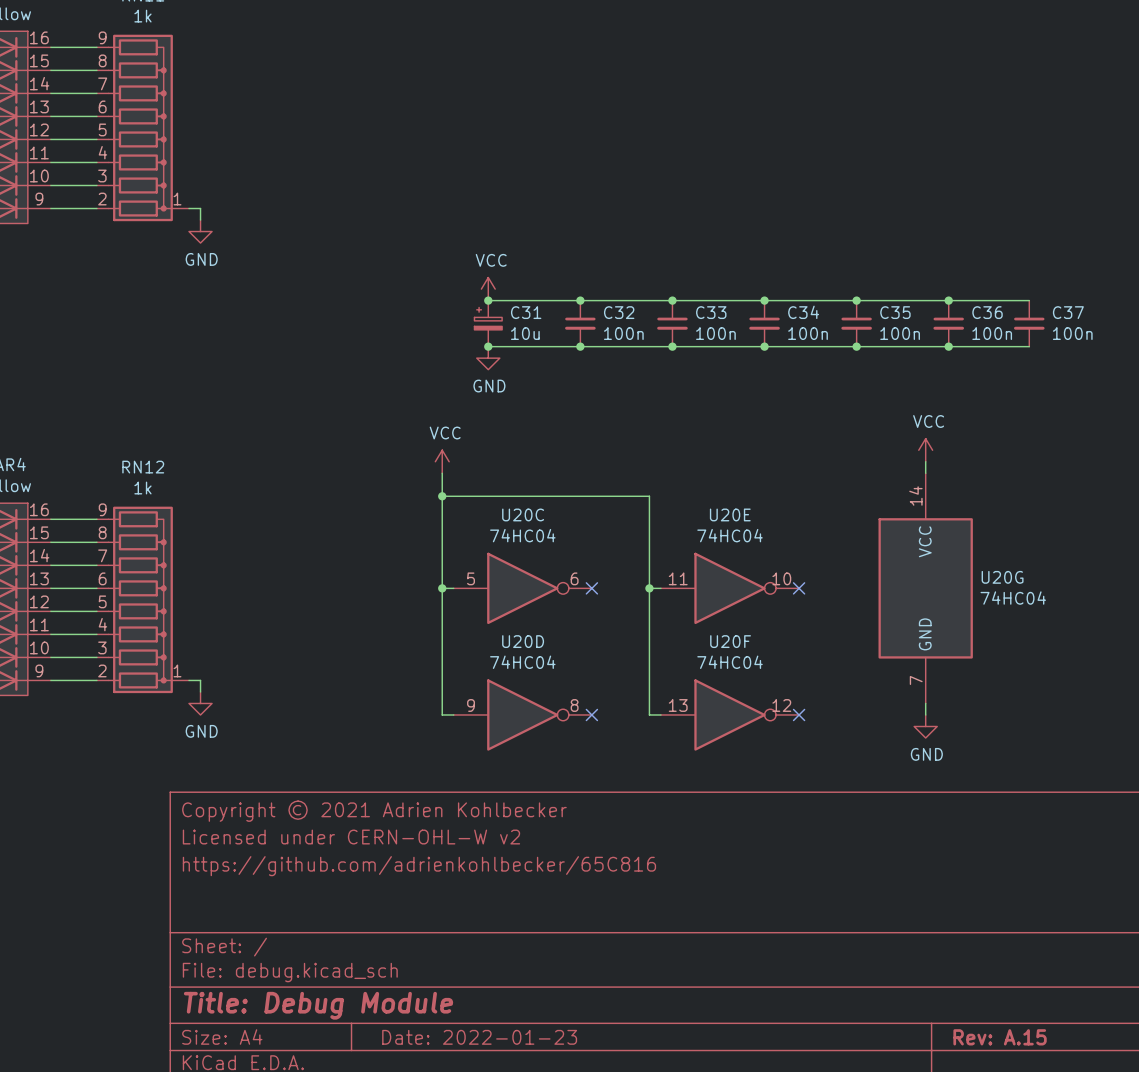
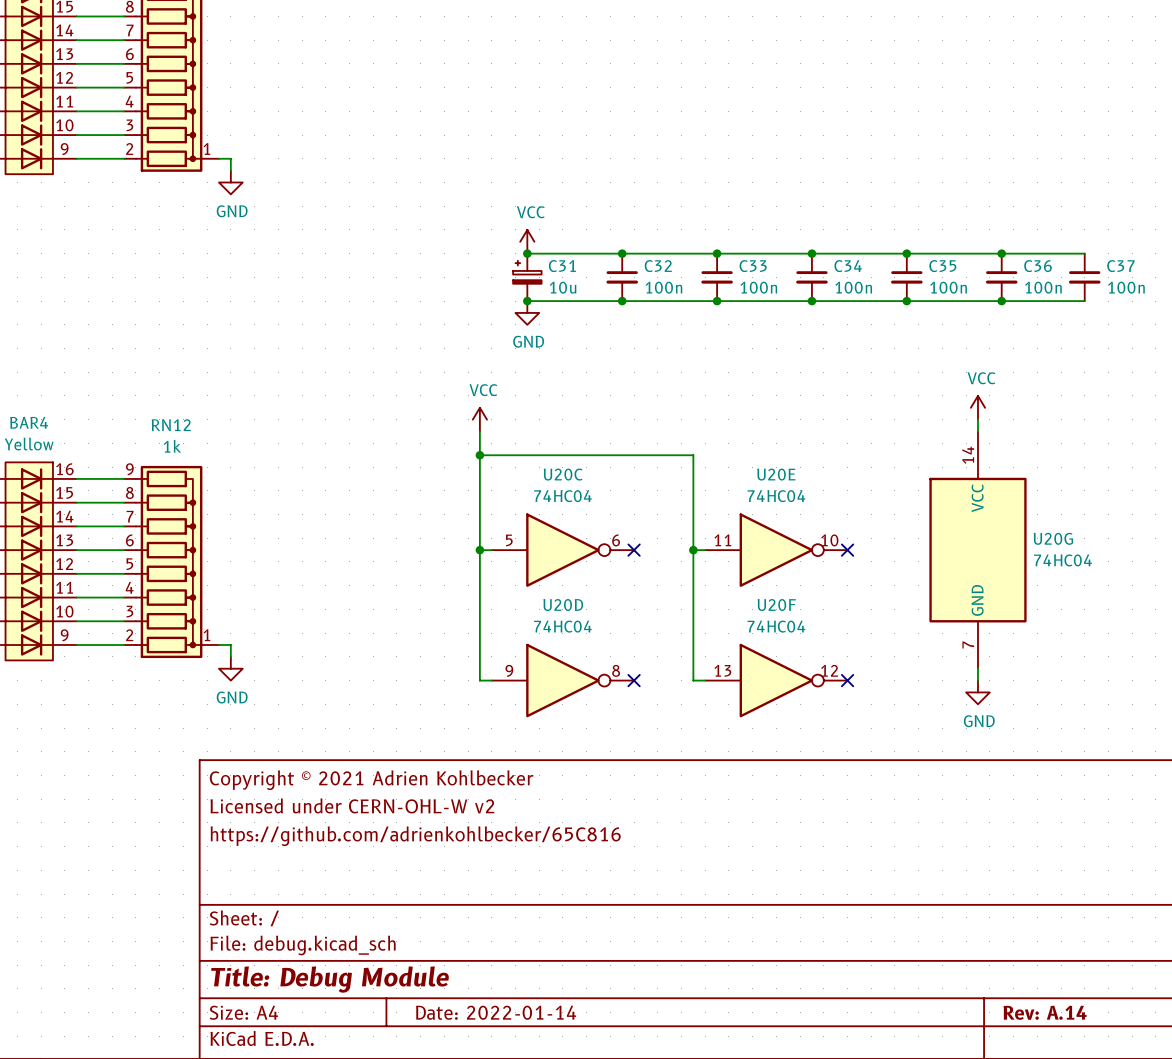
title block: Date: 2022-01-23 (479, 1037) -> Date: 2022-01-14 (496, 1012)
title block: Rev: A.15 (1000, 1037) -> Rev: A.14 (1045, 1012)

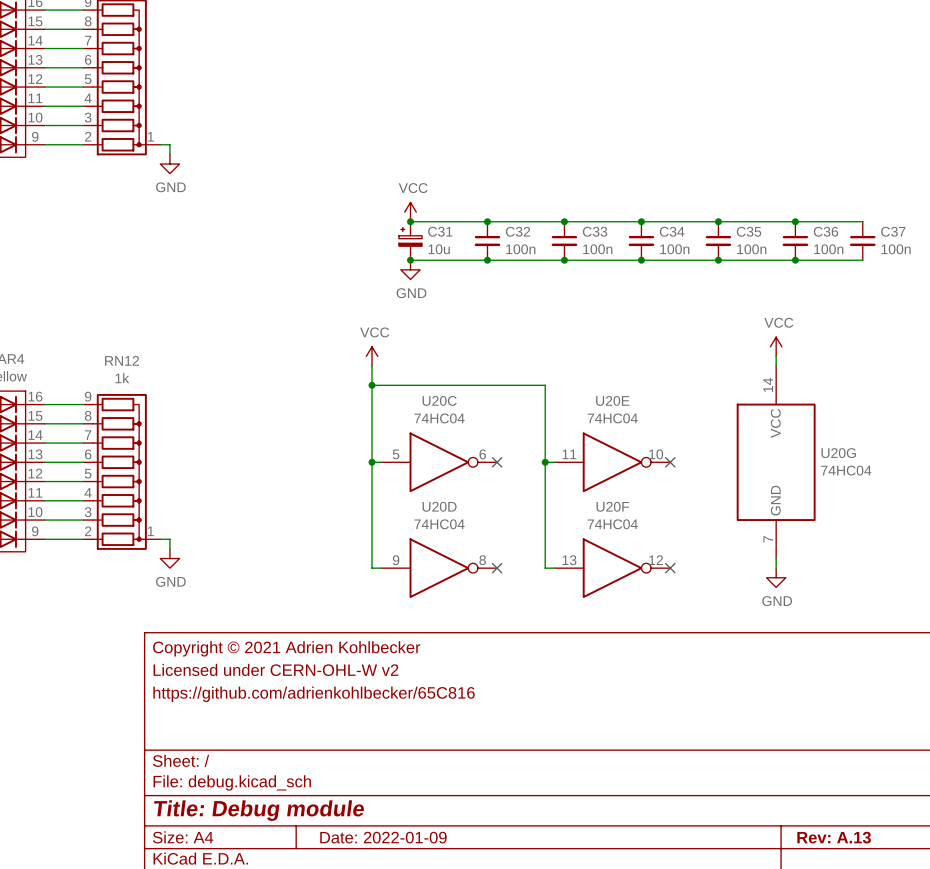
title block: Title: Debug Module (330, 979) -> Title: Debug module (259, 810)
title block: Date: 2022-01-14 (496, 1012) -> Date: 2022-01-09 (383, 837)
title block: Rev: A.14 (1045, 1012) -> Rev: A.13 (834, 837)

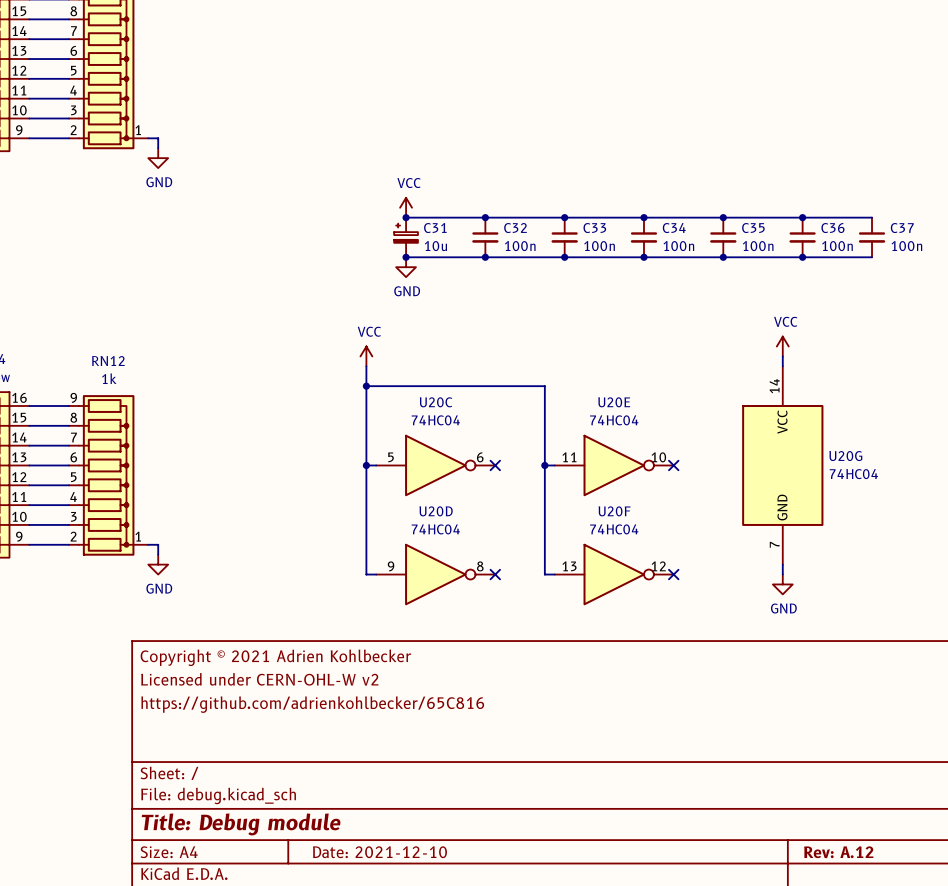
title block: Date: 2022-01-09 (383, 837) -> Date: 2021-12-10 (379, 852)
title block: Rev: A.13 (834, 837) -> Rev: A.12 (838, 852)

